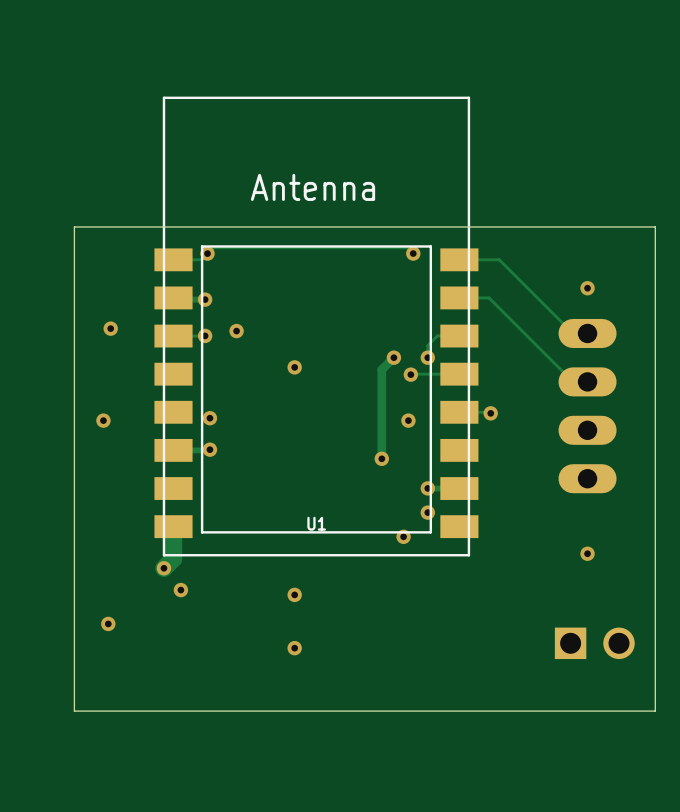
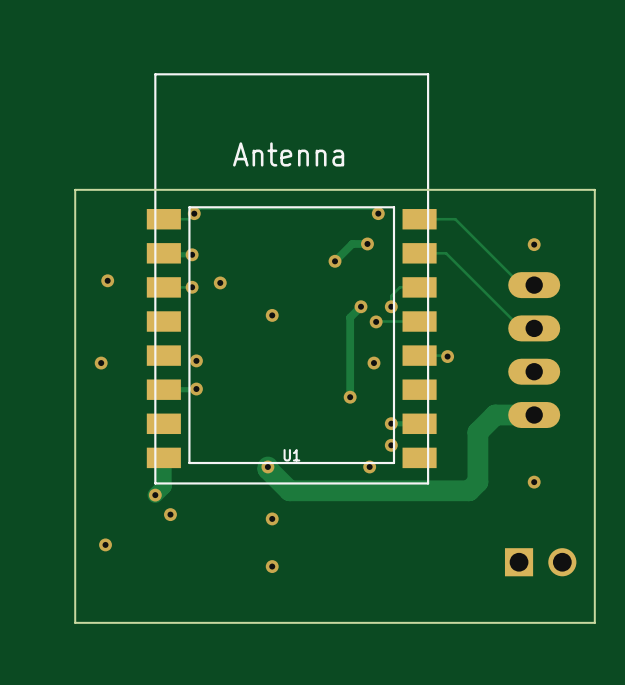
track: none -> (367, 243) (352, 243) (335, 261)
via: none -> (367, 243)
via: none -> (335, 261)
track: none -> (534, 415) (495, 415) (477, 432) (477, 482) (469, 490) (289, 490) (267, 466)
via: none -> (267, 466)

